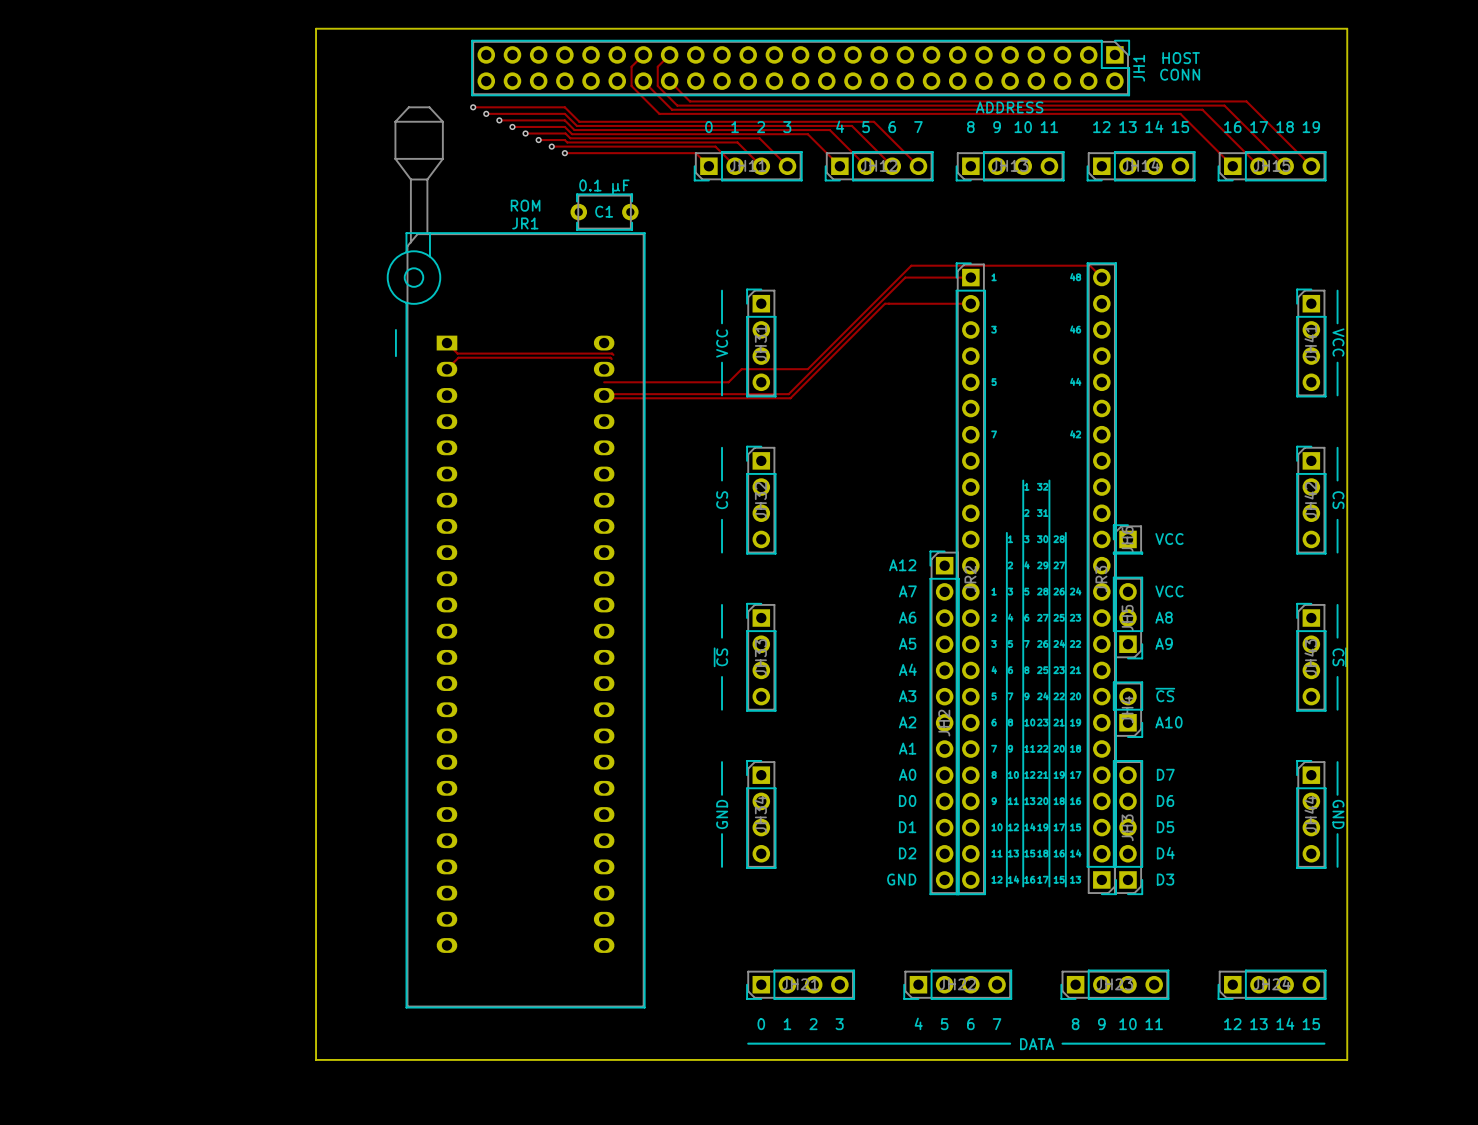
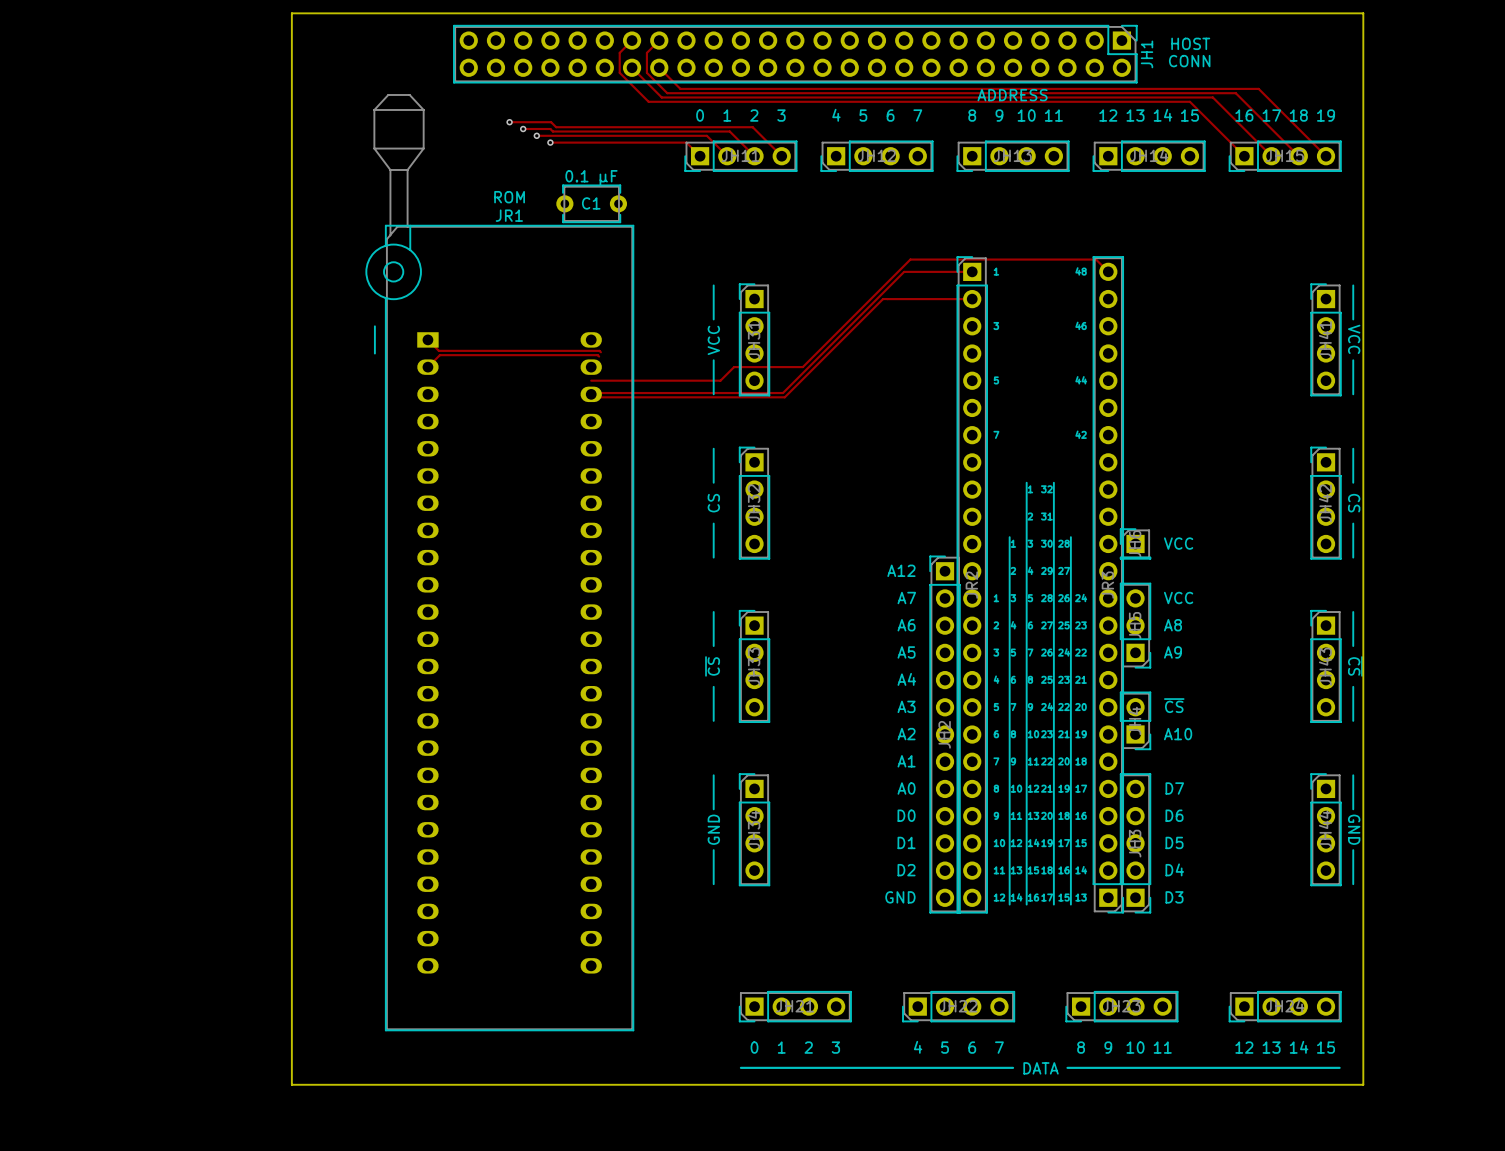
track: (473, 107) (564, 107) (579, 121) (874, 121) (918, 166) -> none
via: (473, 107) -> none
track: (486, 113) (564, 113) (576, 125) (851, 125) (892, 166) -> none
via: (486, 113) -> none
track: (499, 120) (564, 120) (574, 130) (829, 130) (866, 166) -> none
via: (499, 120) -> none
track: (512, 126) (564, 126) (572, 134) (807, 134) (839, 166) -> none
via: (512, 126) -> none

